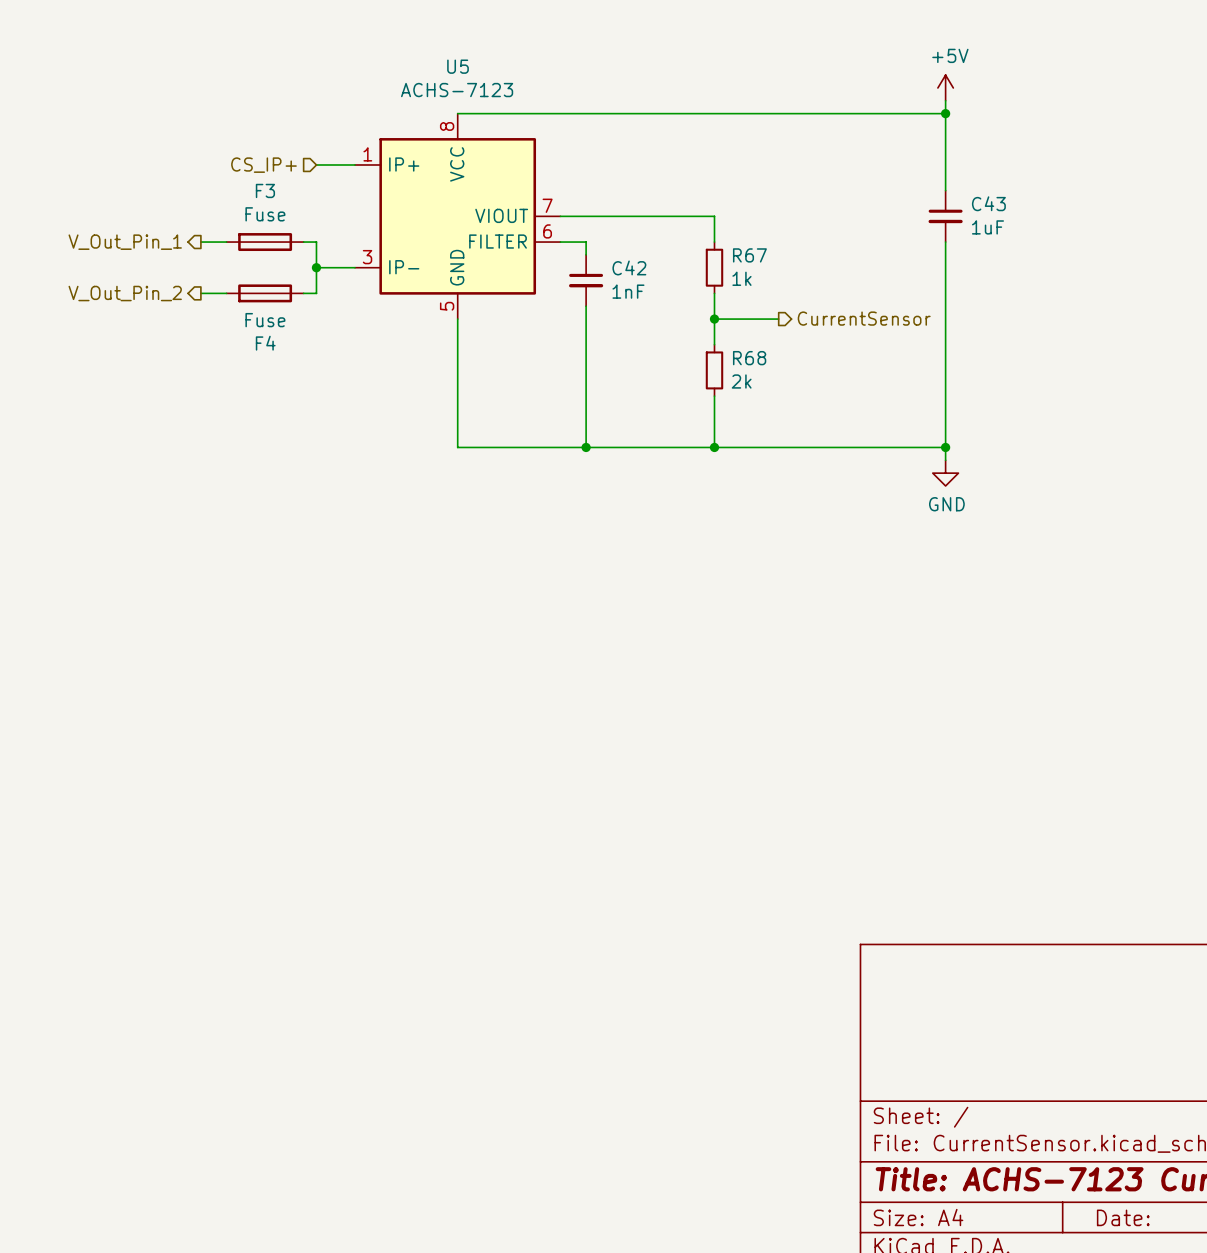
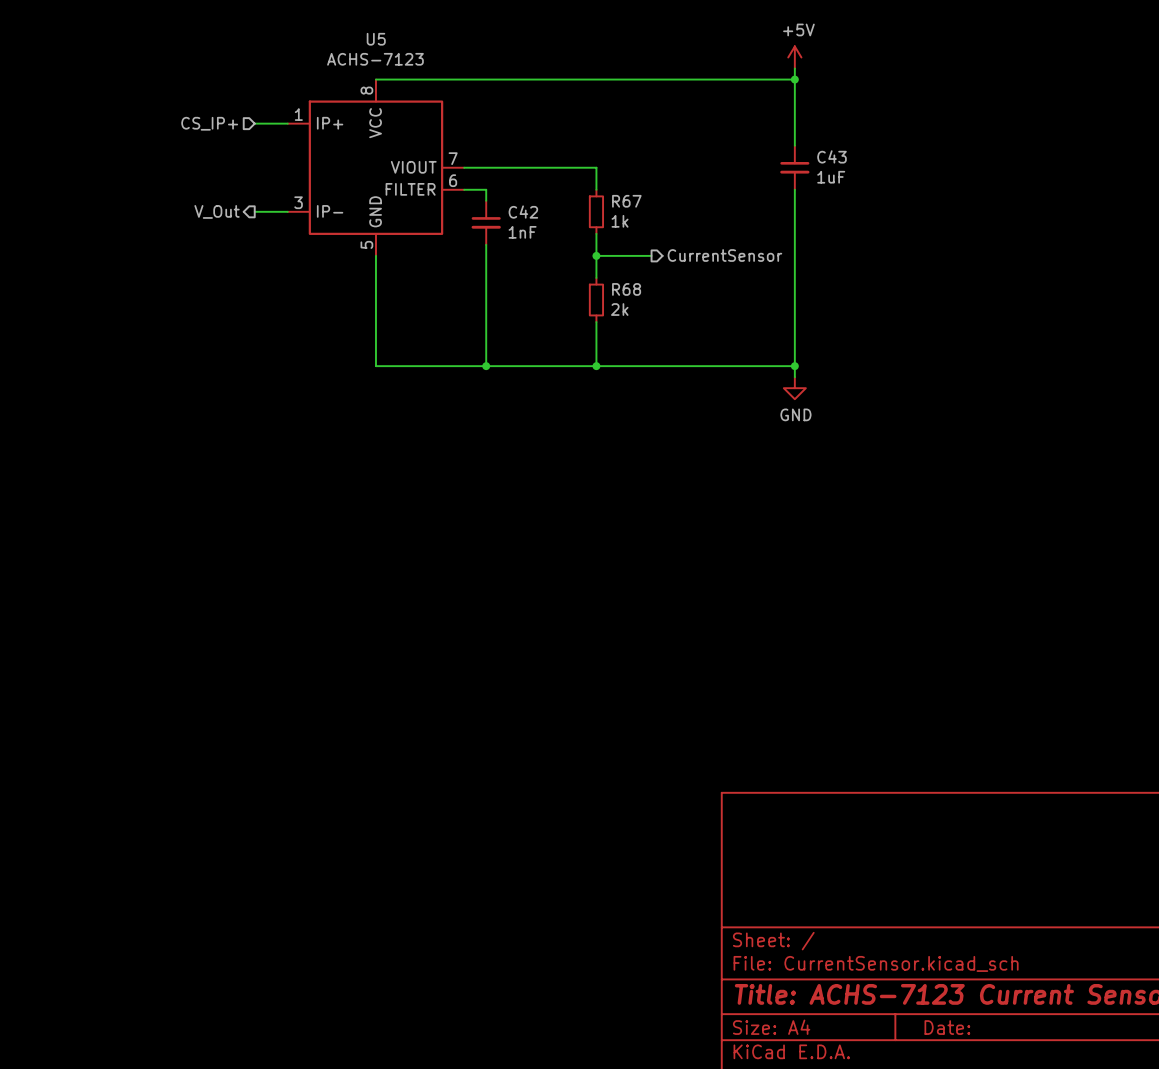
hierarchical label: V_Out_Pin_1 (125, 242) -> none
wire: (200, 242) (226, 242) -> none
F3: Fuse (265, 242) -> none
wire: (303, 242) (316, 242) (316, 293) (303, 293) -> none
hierarchical label: none -> V_Out (217, 211)
junction: (316, 267) -> none
hierarchical label: V_Out_Pin_2 (125, 293) -> none
wire: (200, 293) (226, 293) -> none
F4: Fuse (265, 293) -> none

